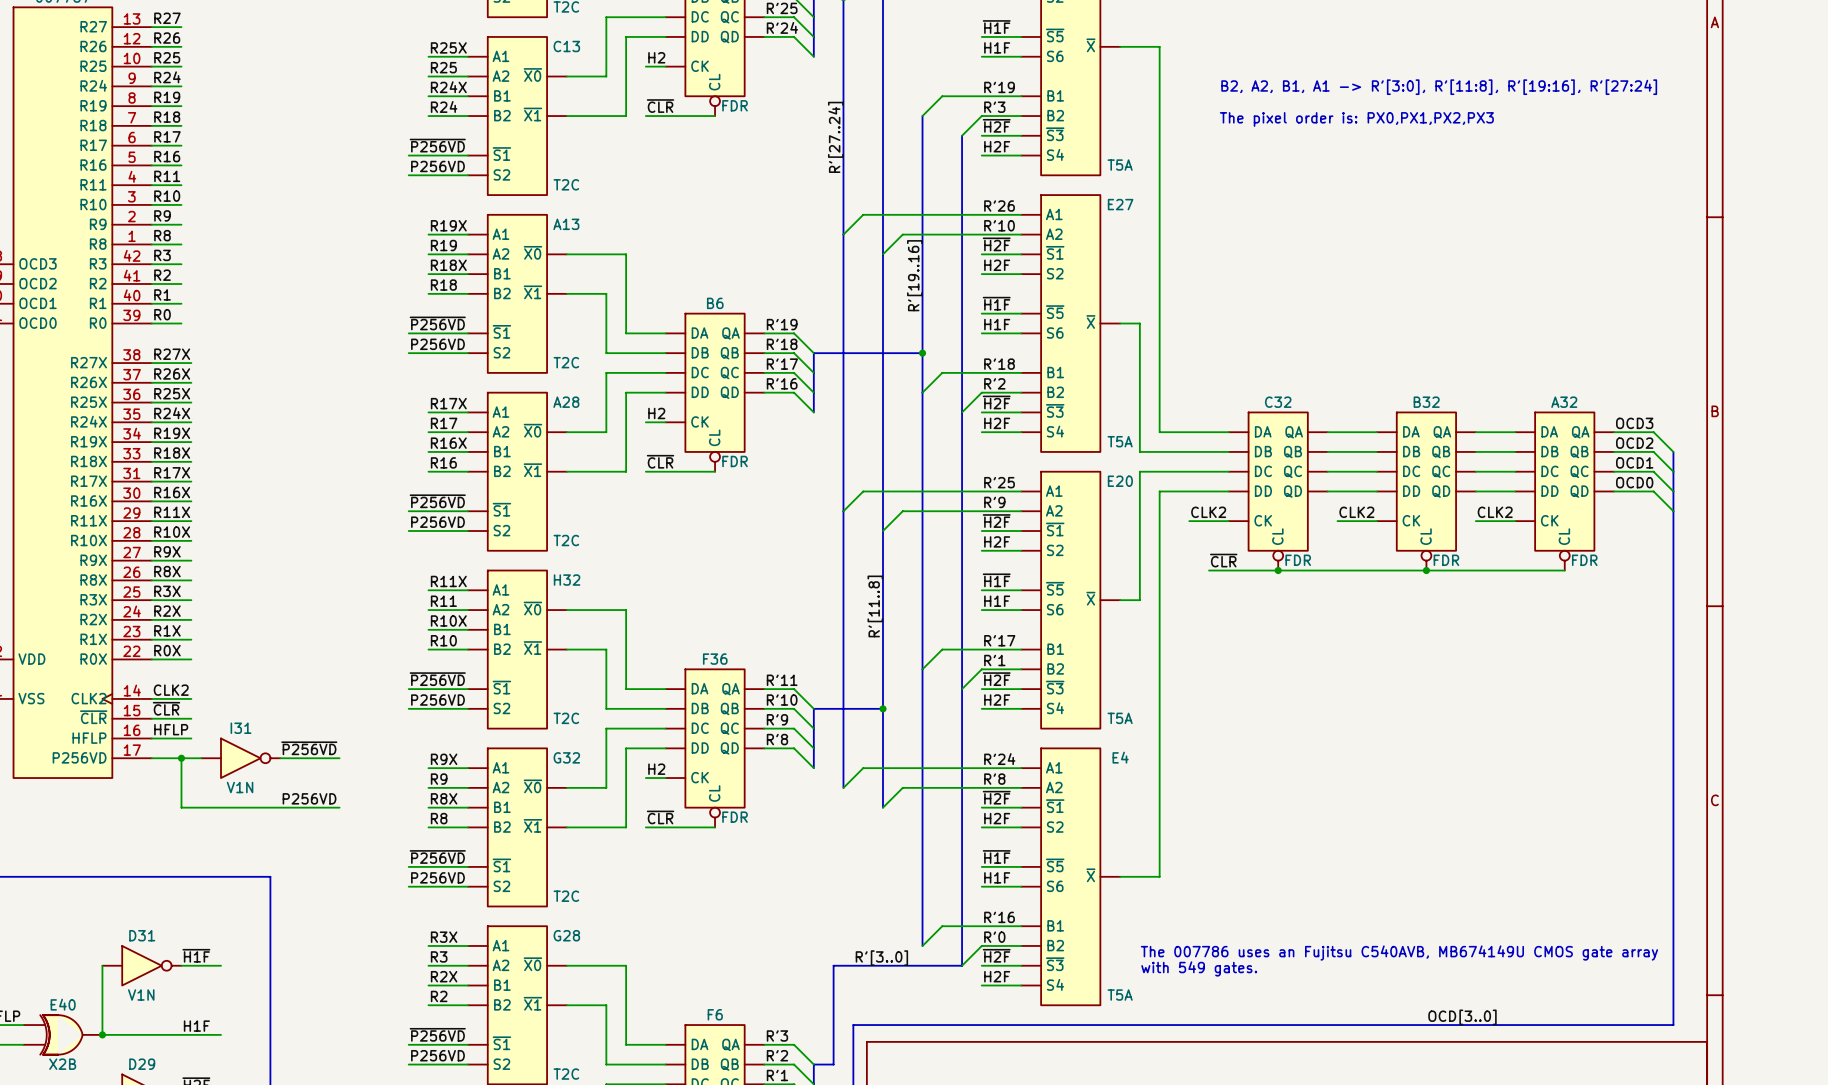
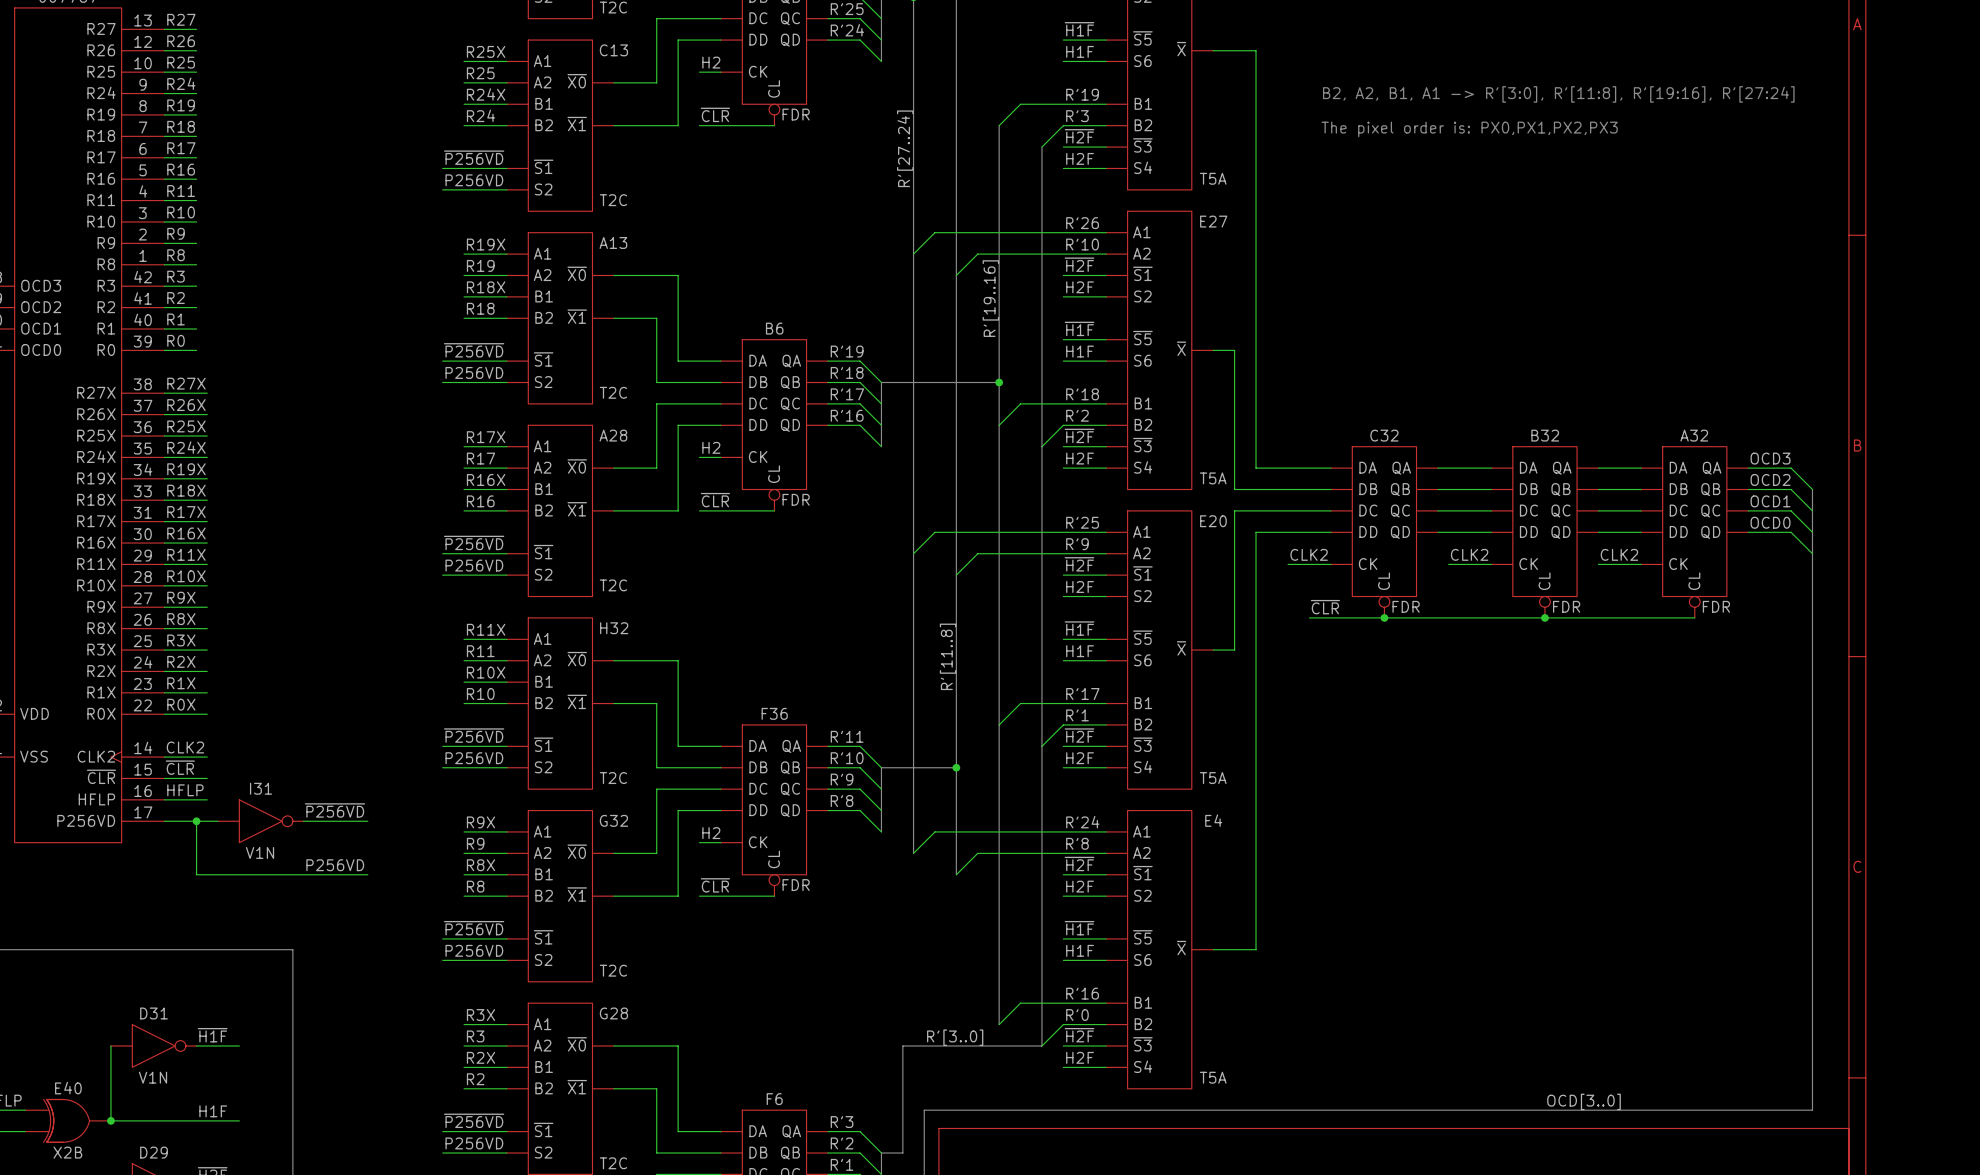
text: The 007786 uses an Fujitsu C540AVB, MB674149U CMOS gate array (1399, 953) -> none
text: with 549 gates. (1199, 968) -> none

